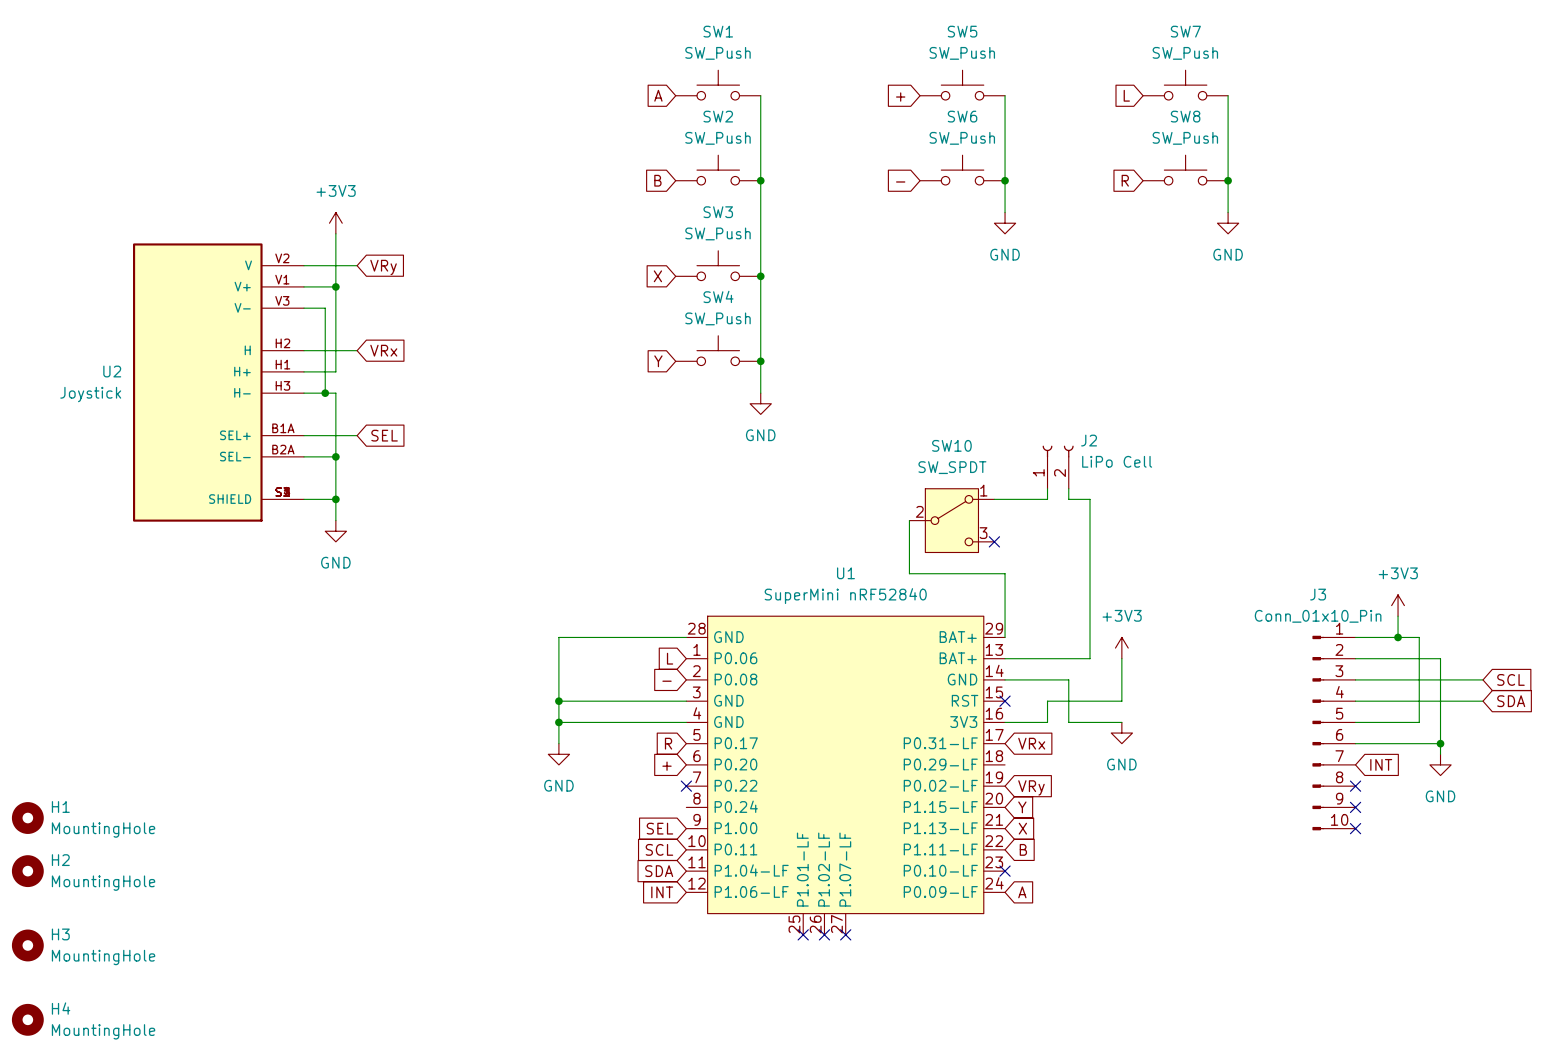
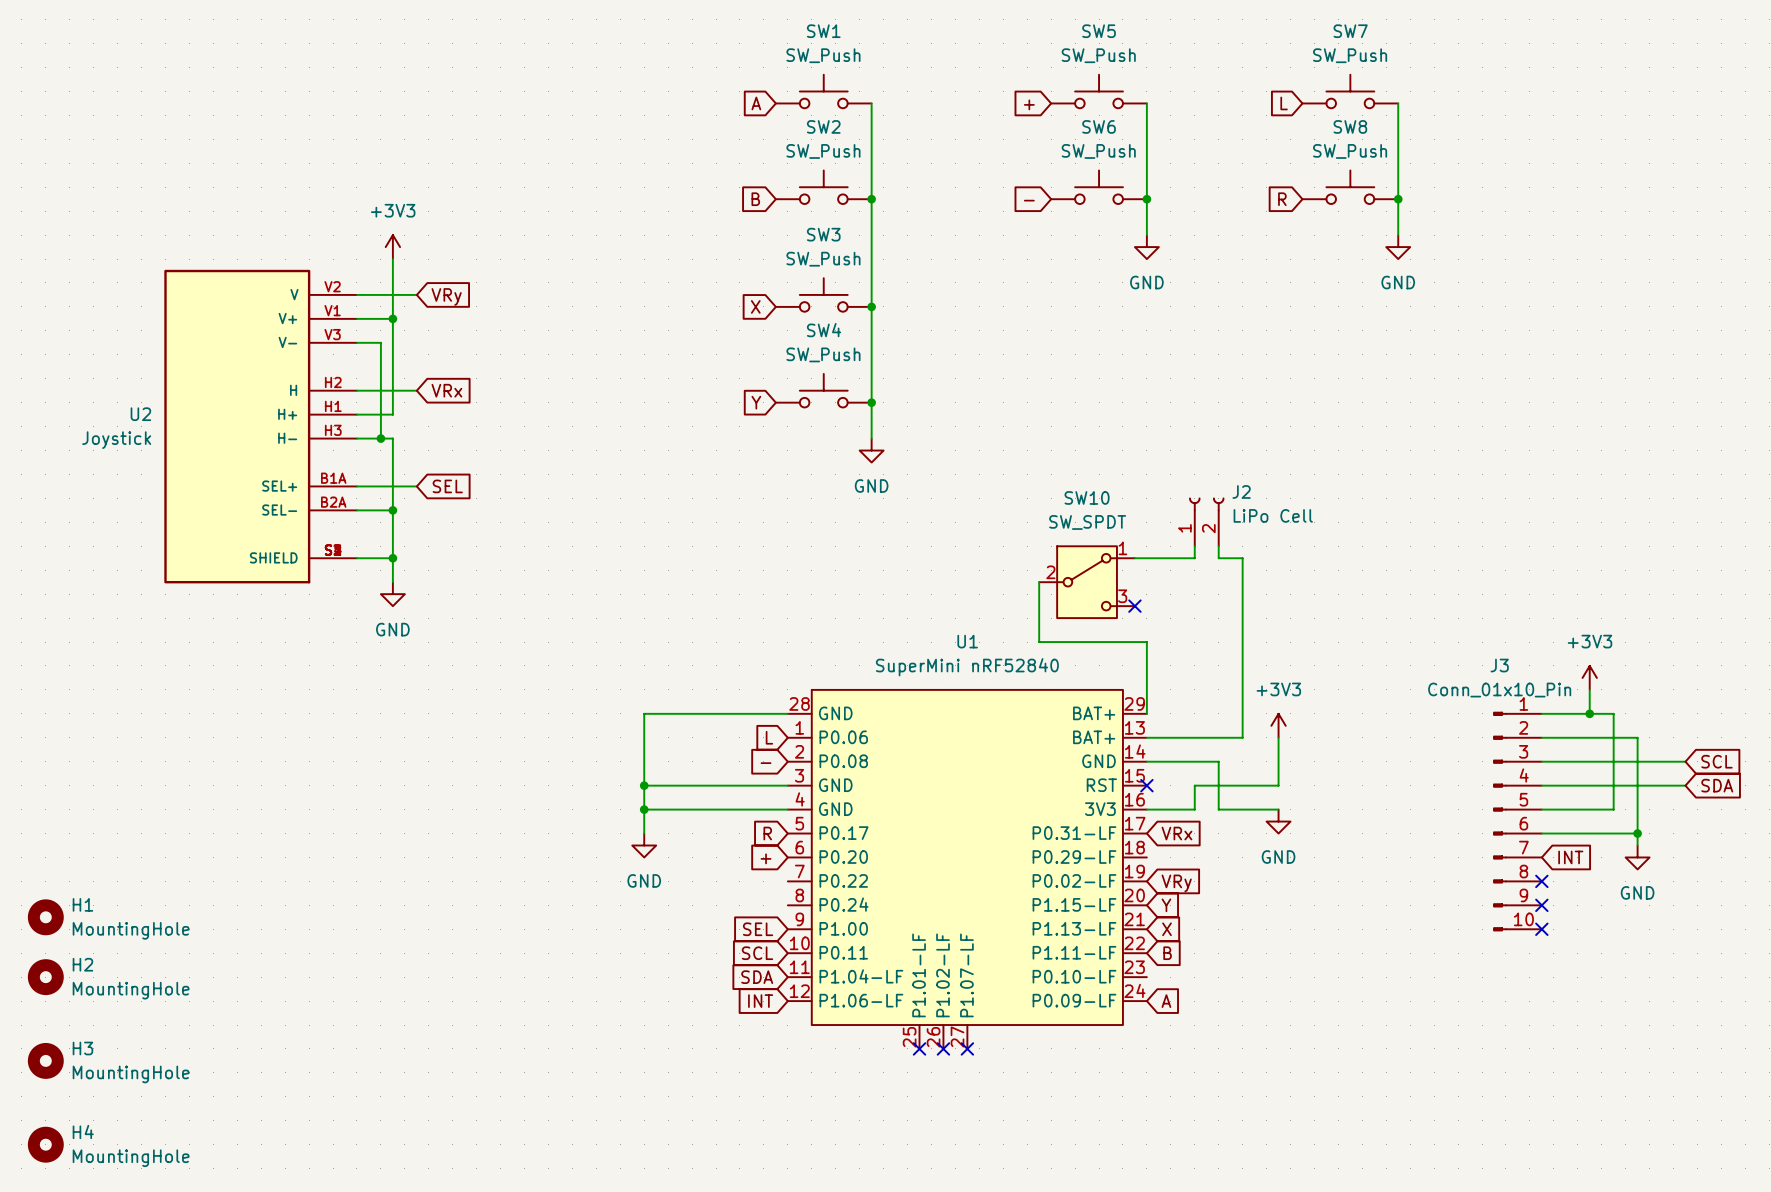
no-connect mark: (686, 786) -> none
no-connect mark: (1005, 871) -> none

